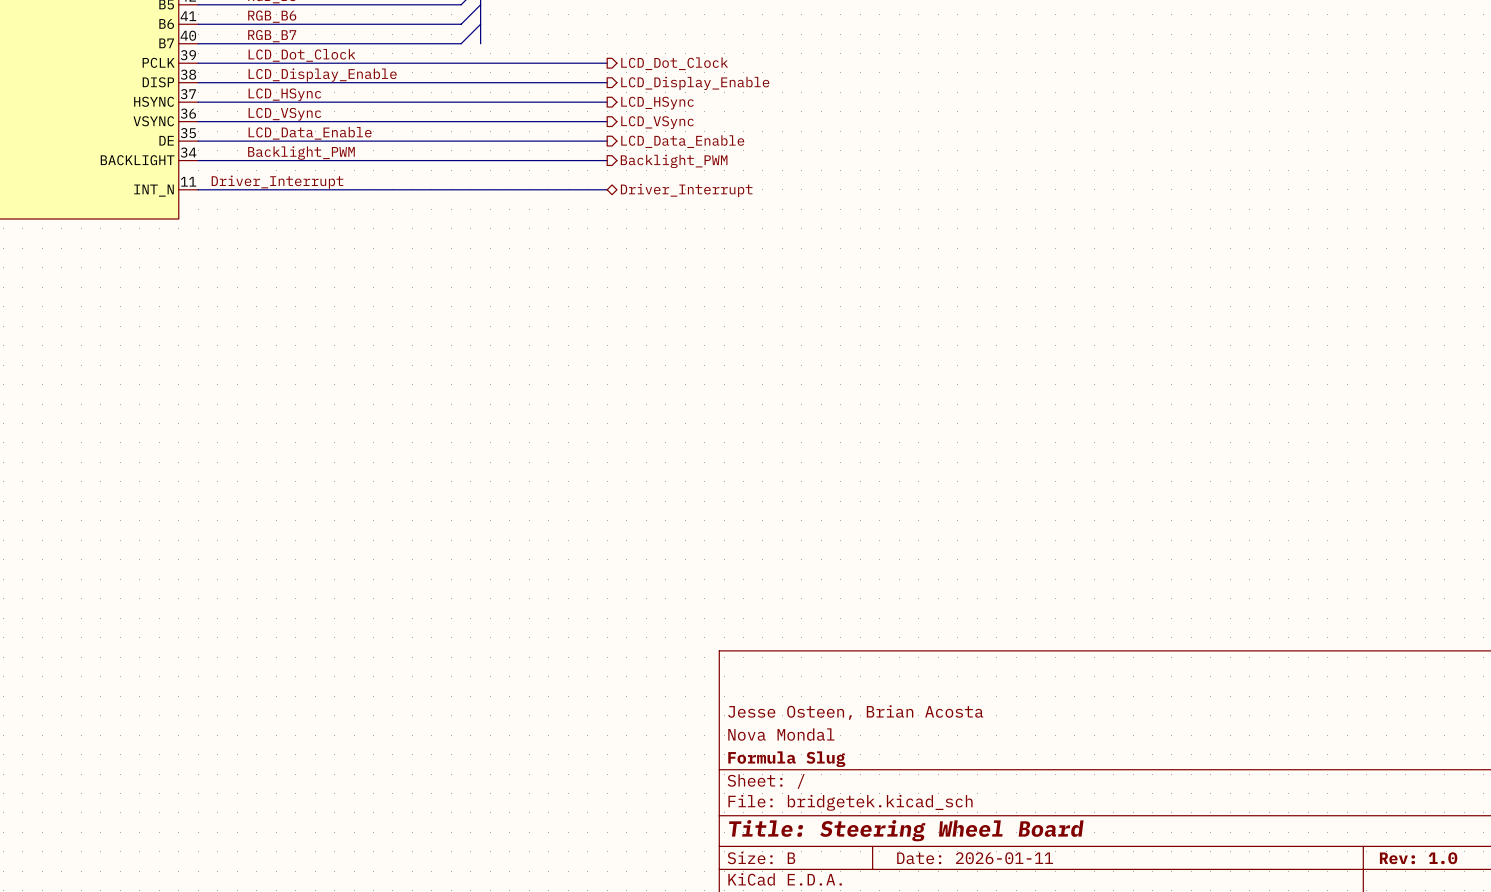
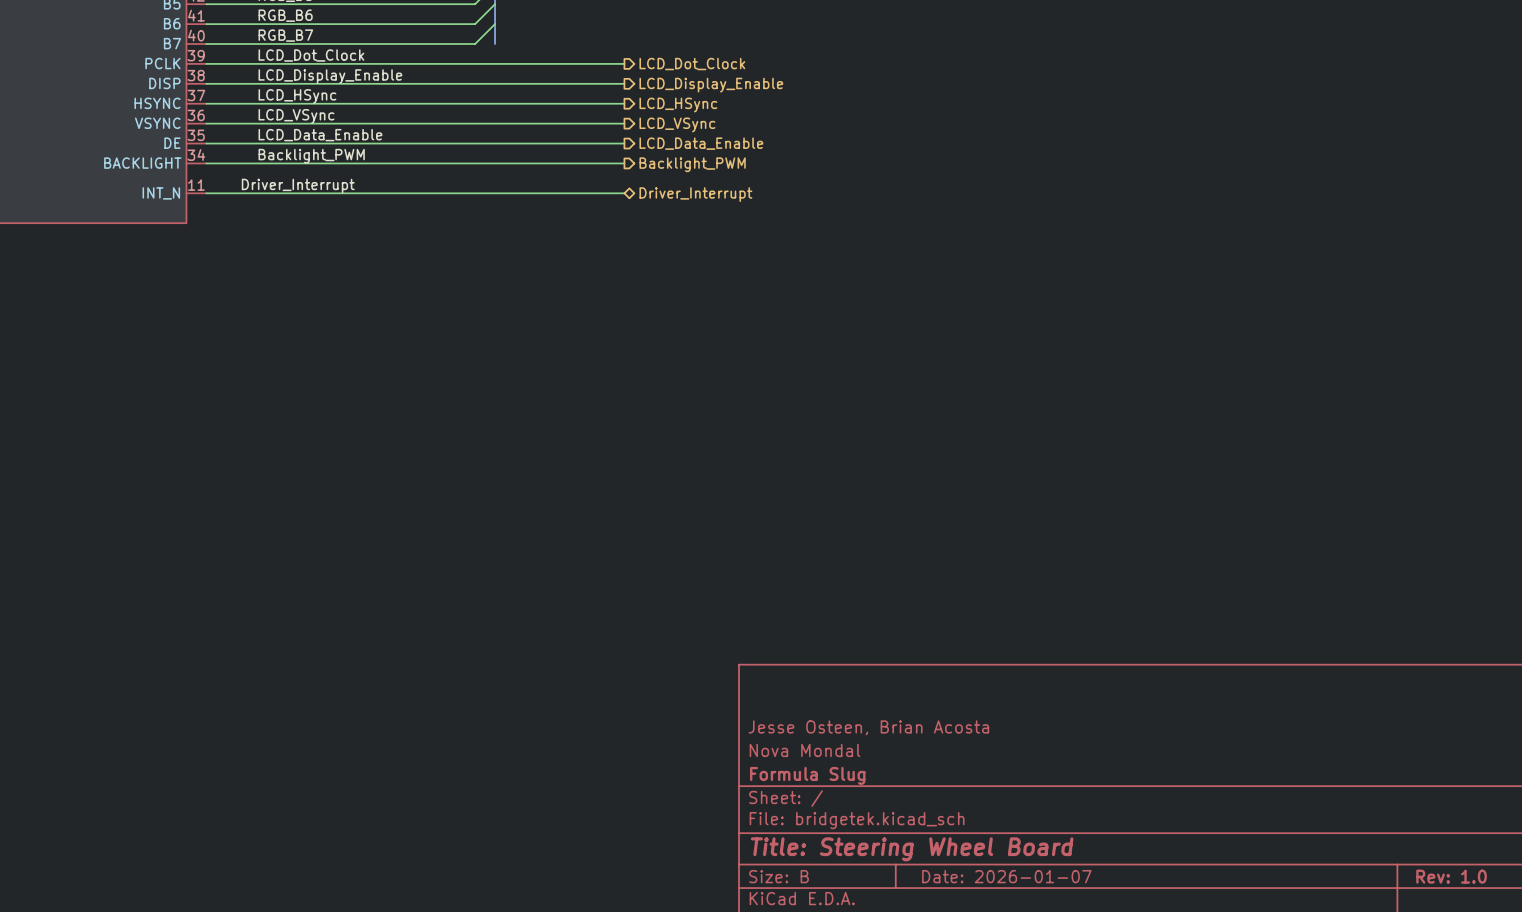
title block: Date: 2026-01-11 (975, 858) -> Date: 2026-01-07 (1006, 876)

